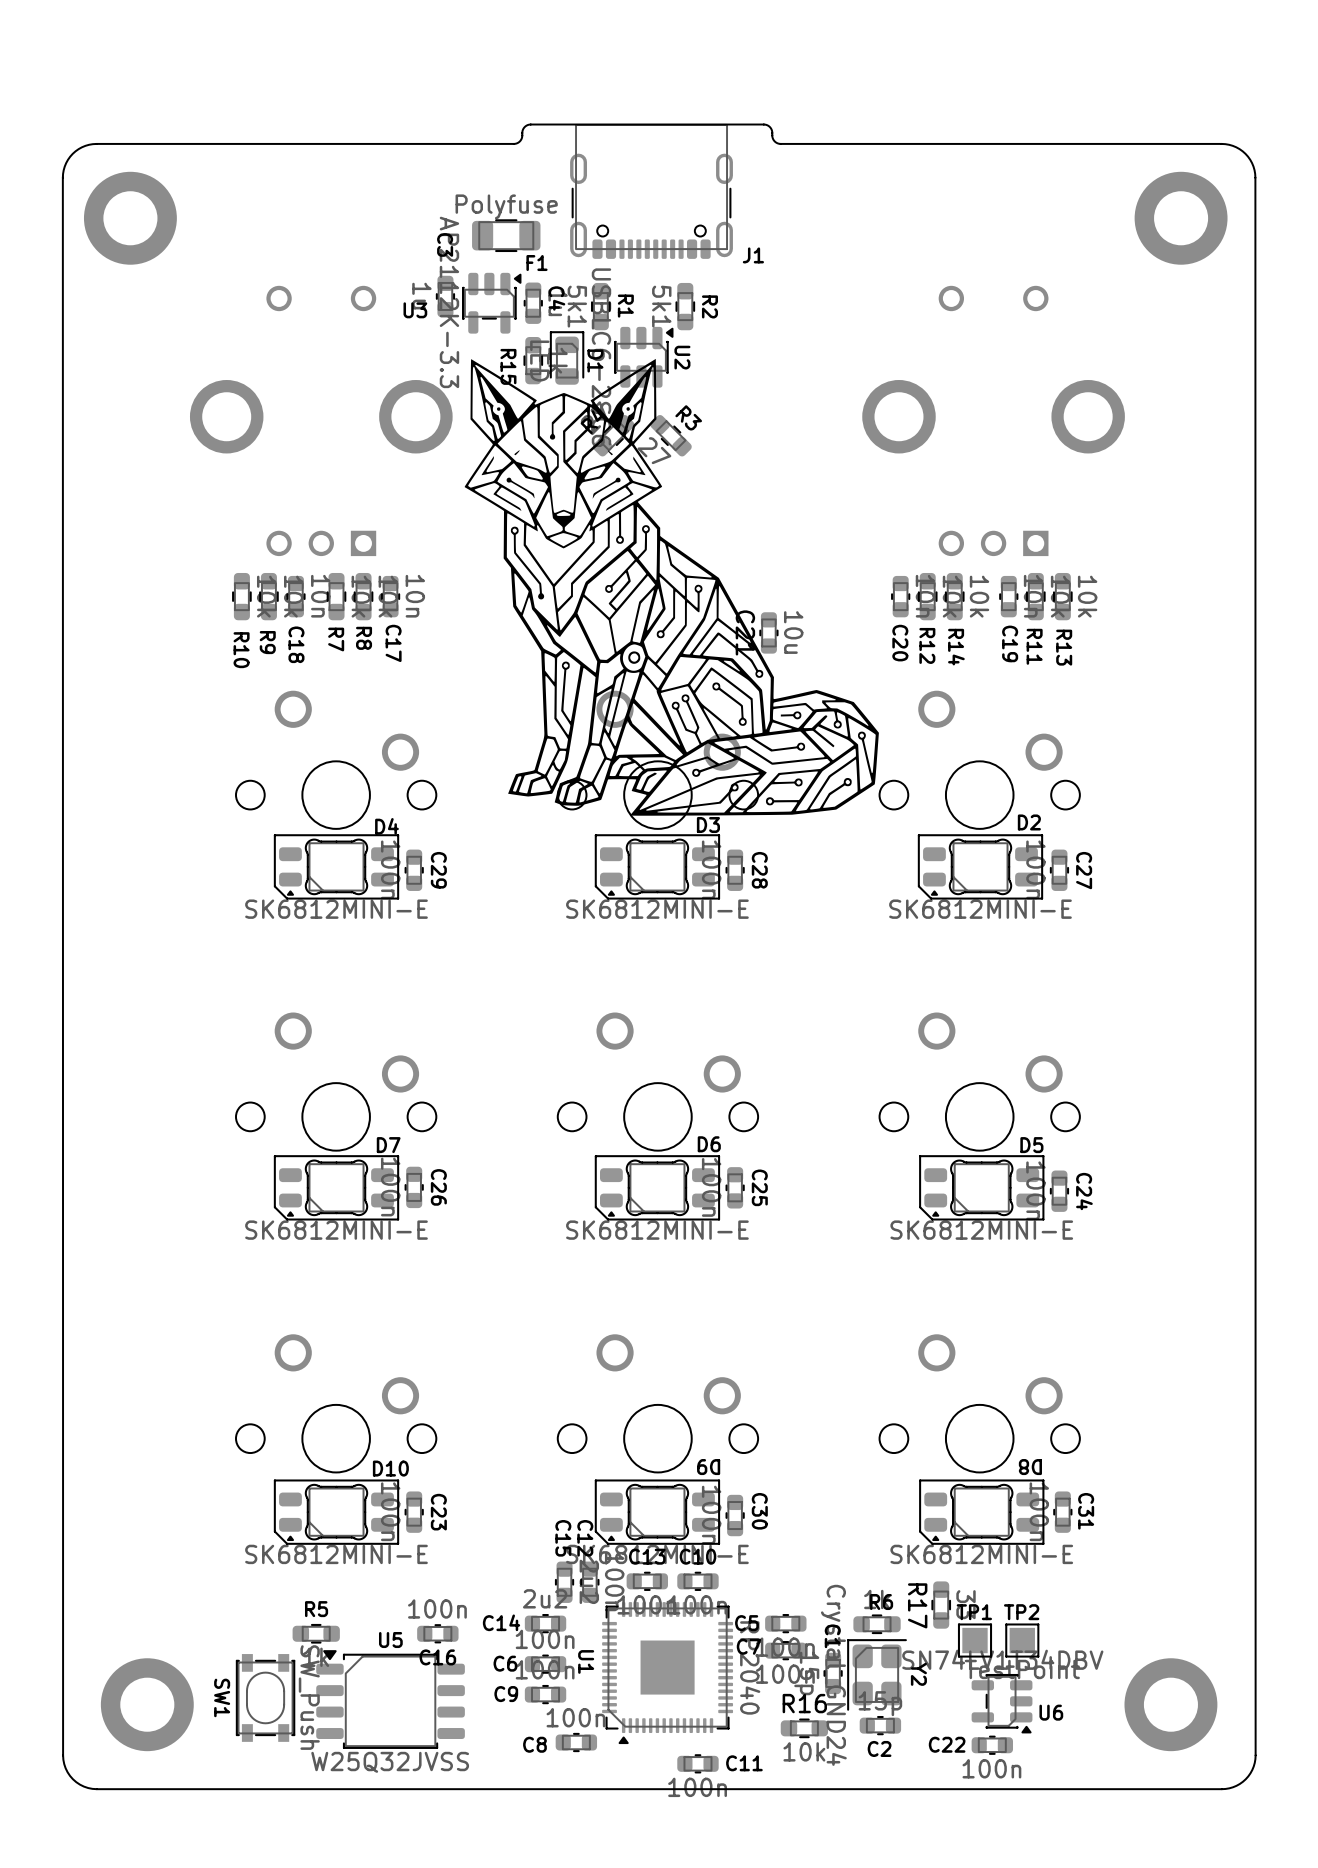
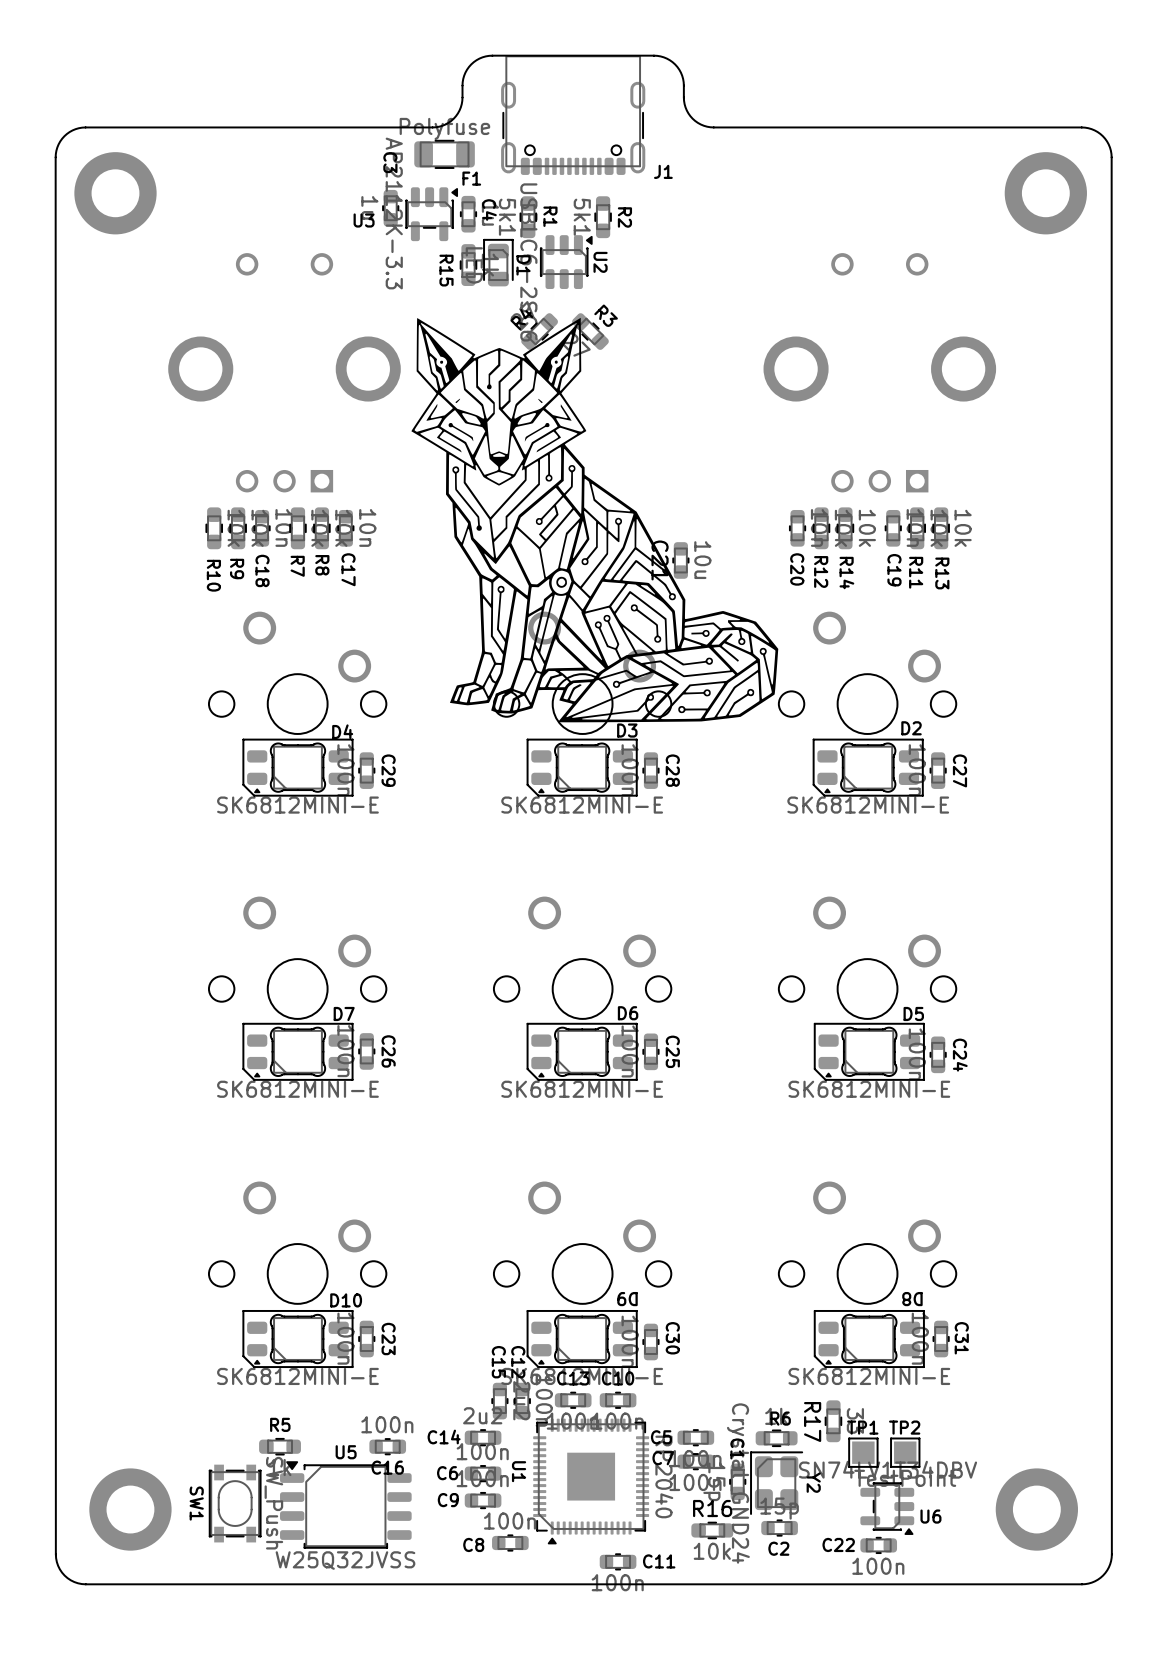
board edge: (806, 143) (777, 143) (772, 138) (770, 127) (763, 124) (529, 124) (524, 127) (521, 138) (517, 143) (488, 143) -> (713, 127) (700, 124) (690, 116) (684, 104) (683, 82) (679, 69) (666, 58) (653, 55) (492, 55) (482, 57) (473, 62) (465, 72) (462, 82) (461, 104) (455, 116) (445, 124) (432, 127)
J1 position: (651, 191) -> (573, 115)
F1 position: (506, 235) -> (444, 154)
C3 position: (445, 296) -> (390, 208)
U3 position: (491, 303) -> (431, 214)
C4 position: (533, 303) -> (468, 214)
R1 position: (600, 306) -> (528, 217)
R2 position: (685, 306) -> (603, 217)
D1 position: (567, 357) -> (498, 262)
U2 position: (643, 357) -> (566, 262)
R15 position: (533, 360) -> (468, 265)
R4 position: (613, 435) -> (539, 331)
R3 position: (671, 435) -> (590, 331)

